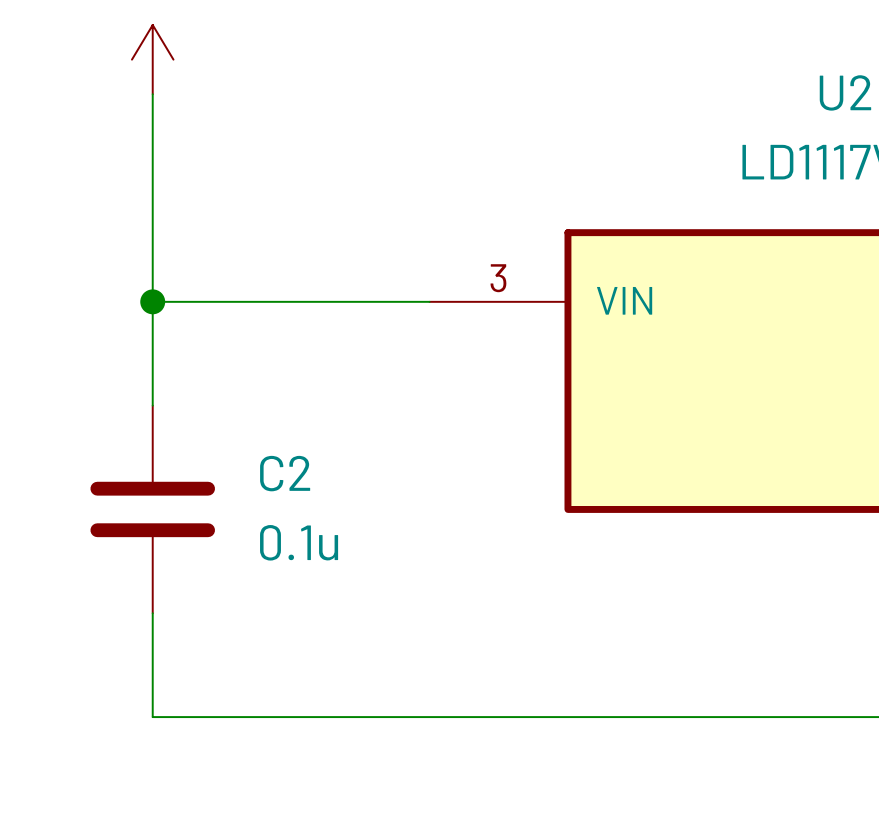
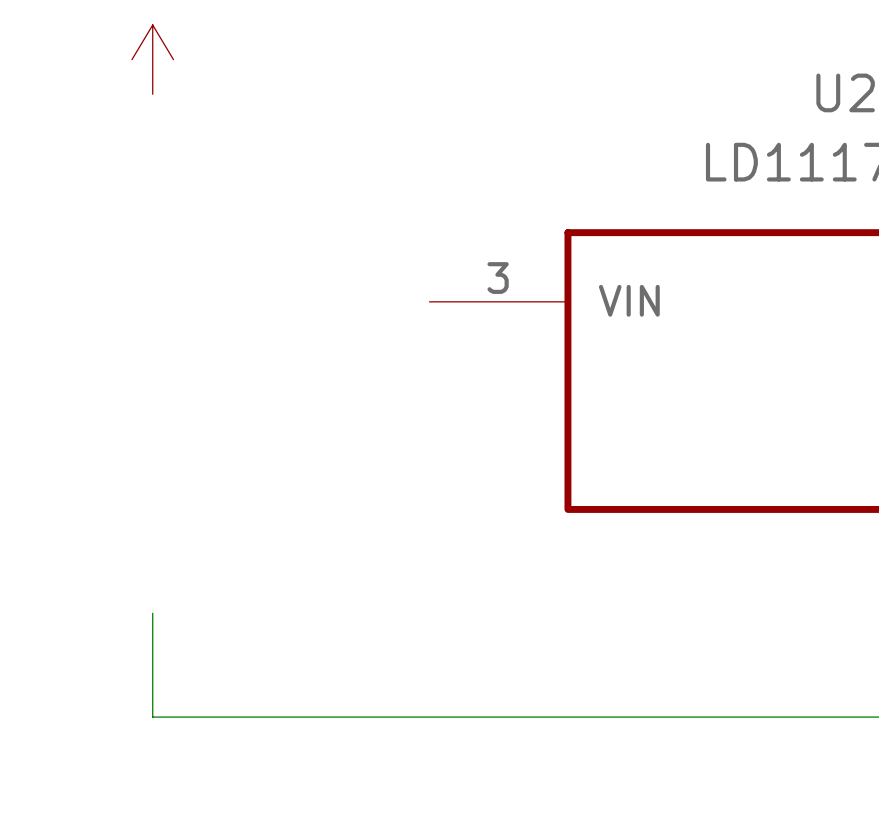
wire: (152, 94) (152, 405) -> none
wire: (152, 301) (429, 301) -> none
junction: (152, 301) -> none
C2: 0.1u (152, 509) -> none

